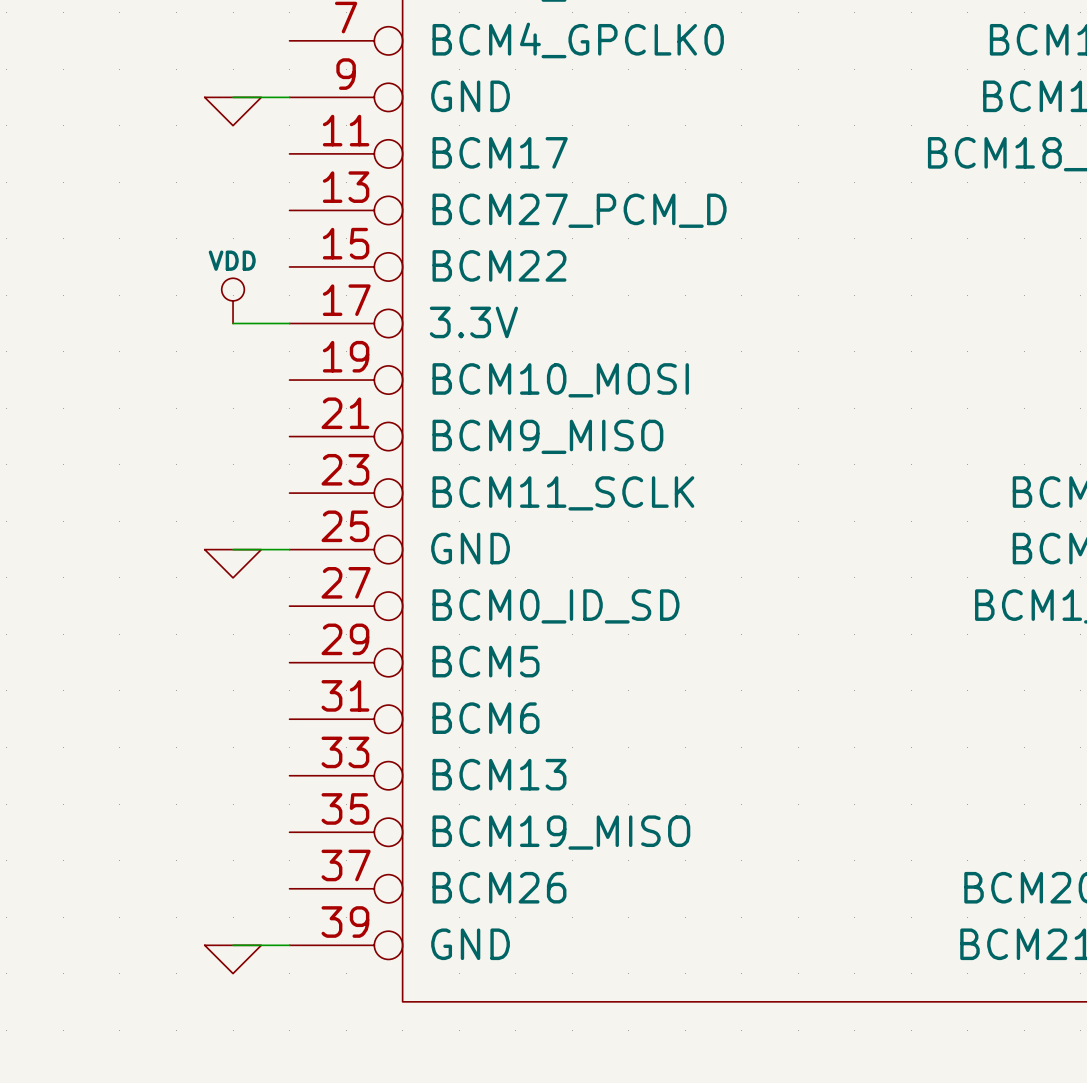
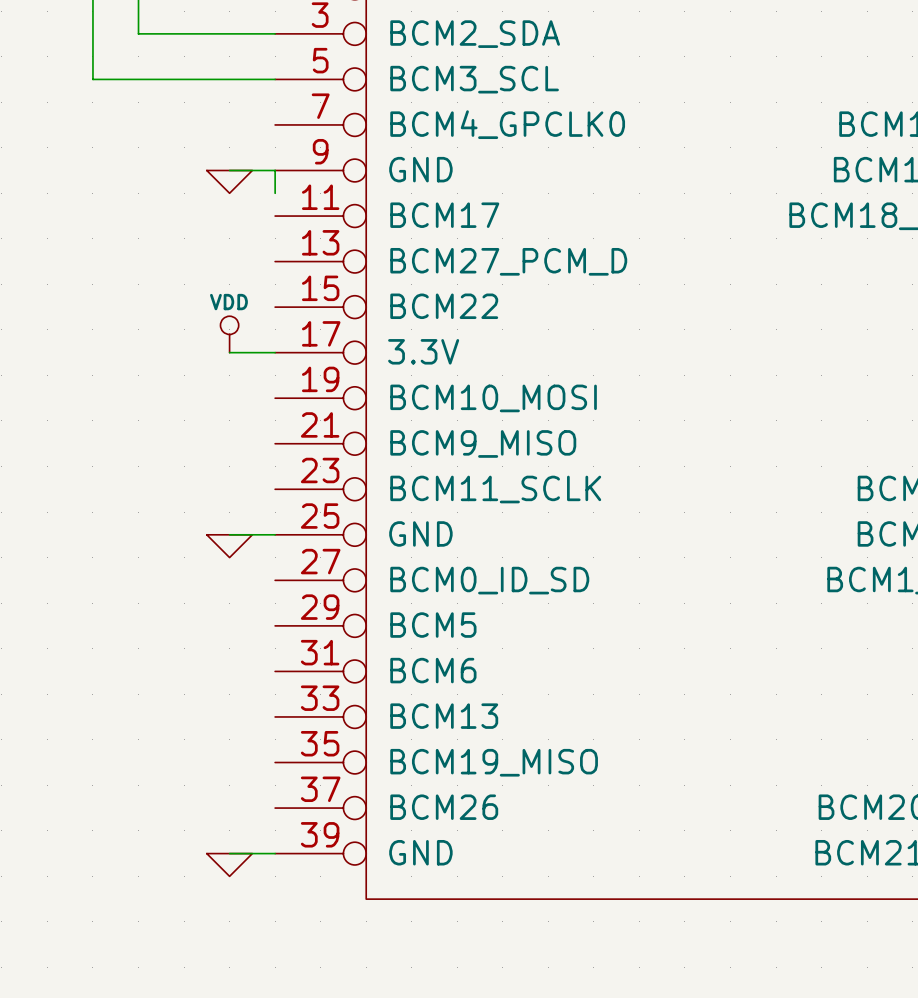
wire: none -> (275, 170) (275, 193)

